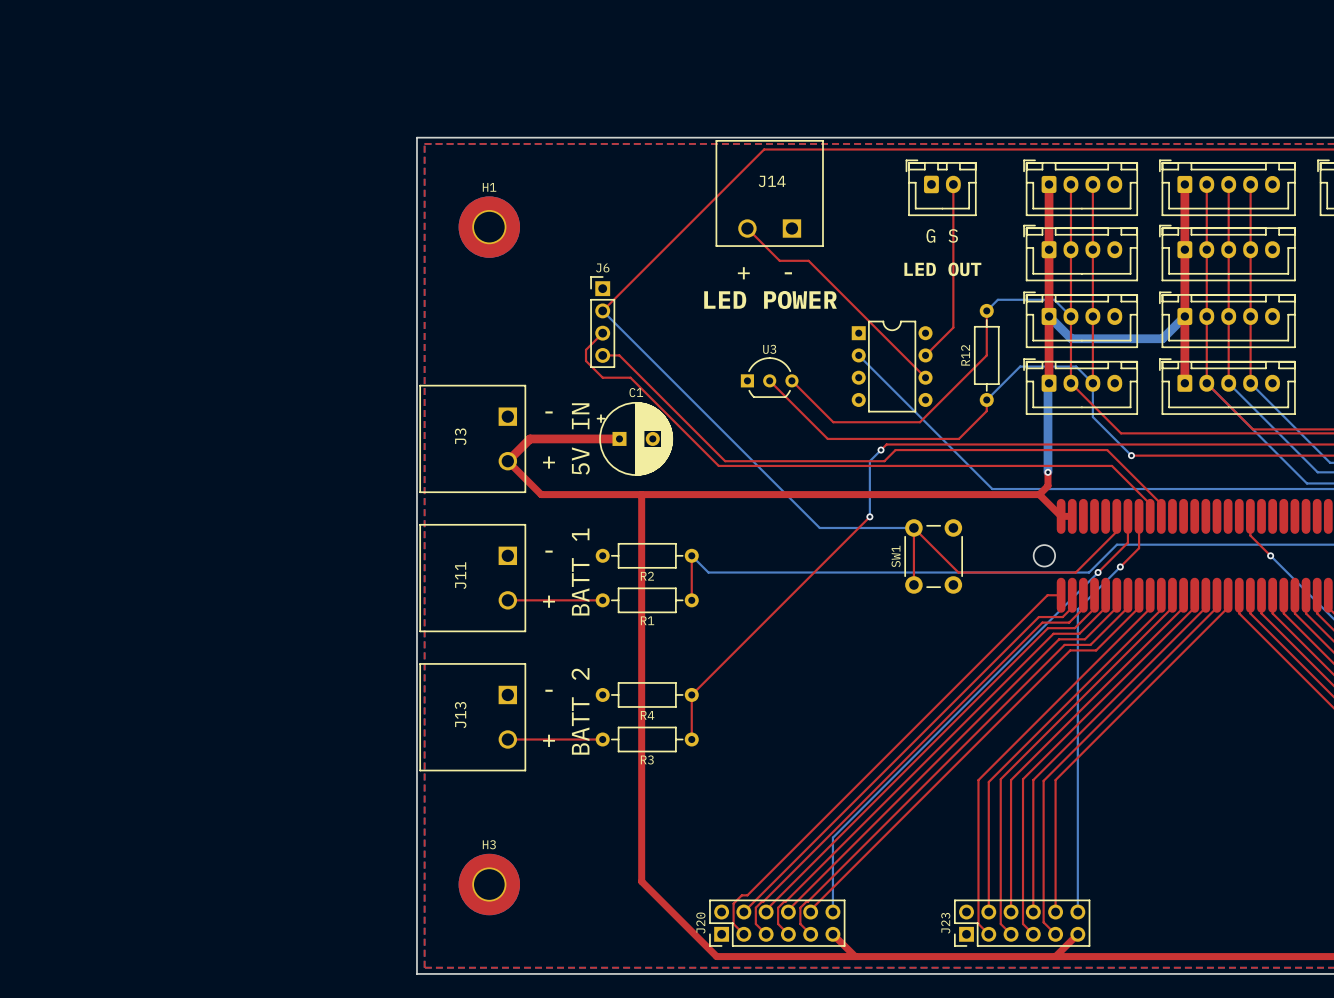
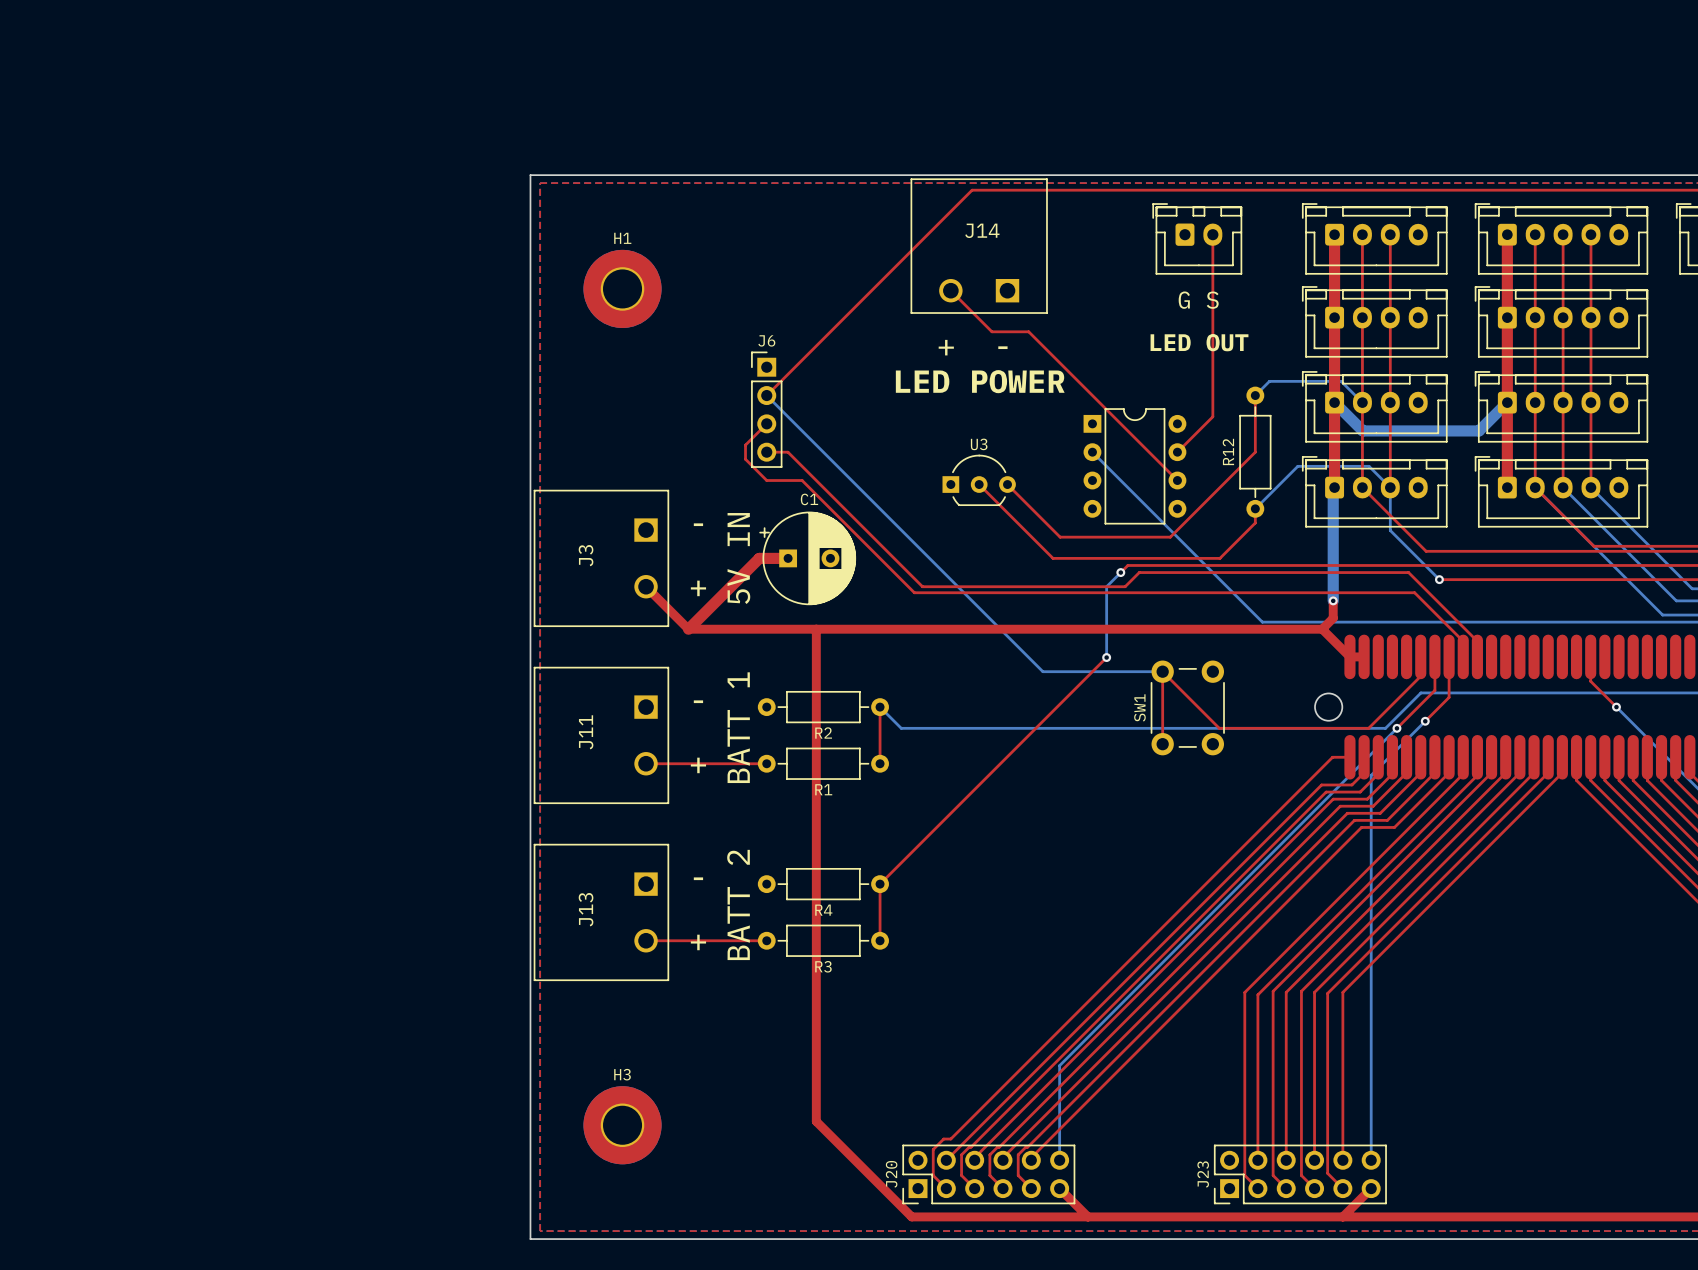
top track: (596, 438) (530, 438) (507, 461) -> (759, 558) (688, 629)

